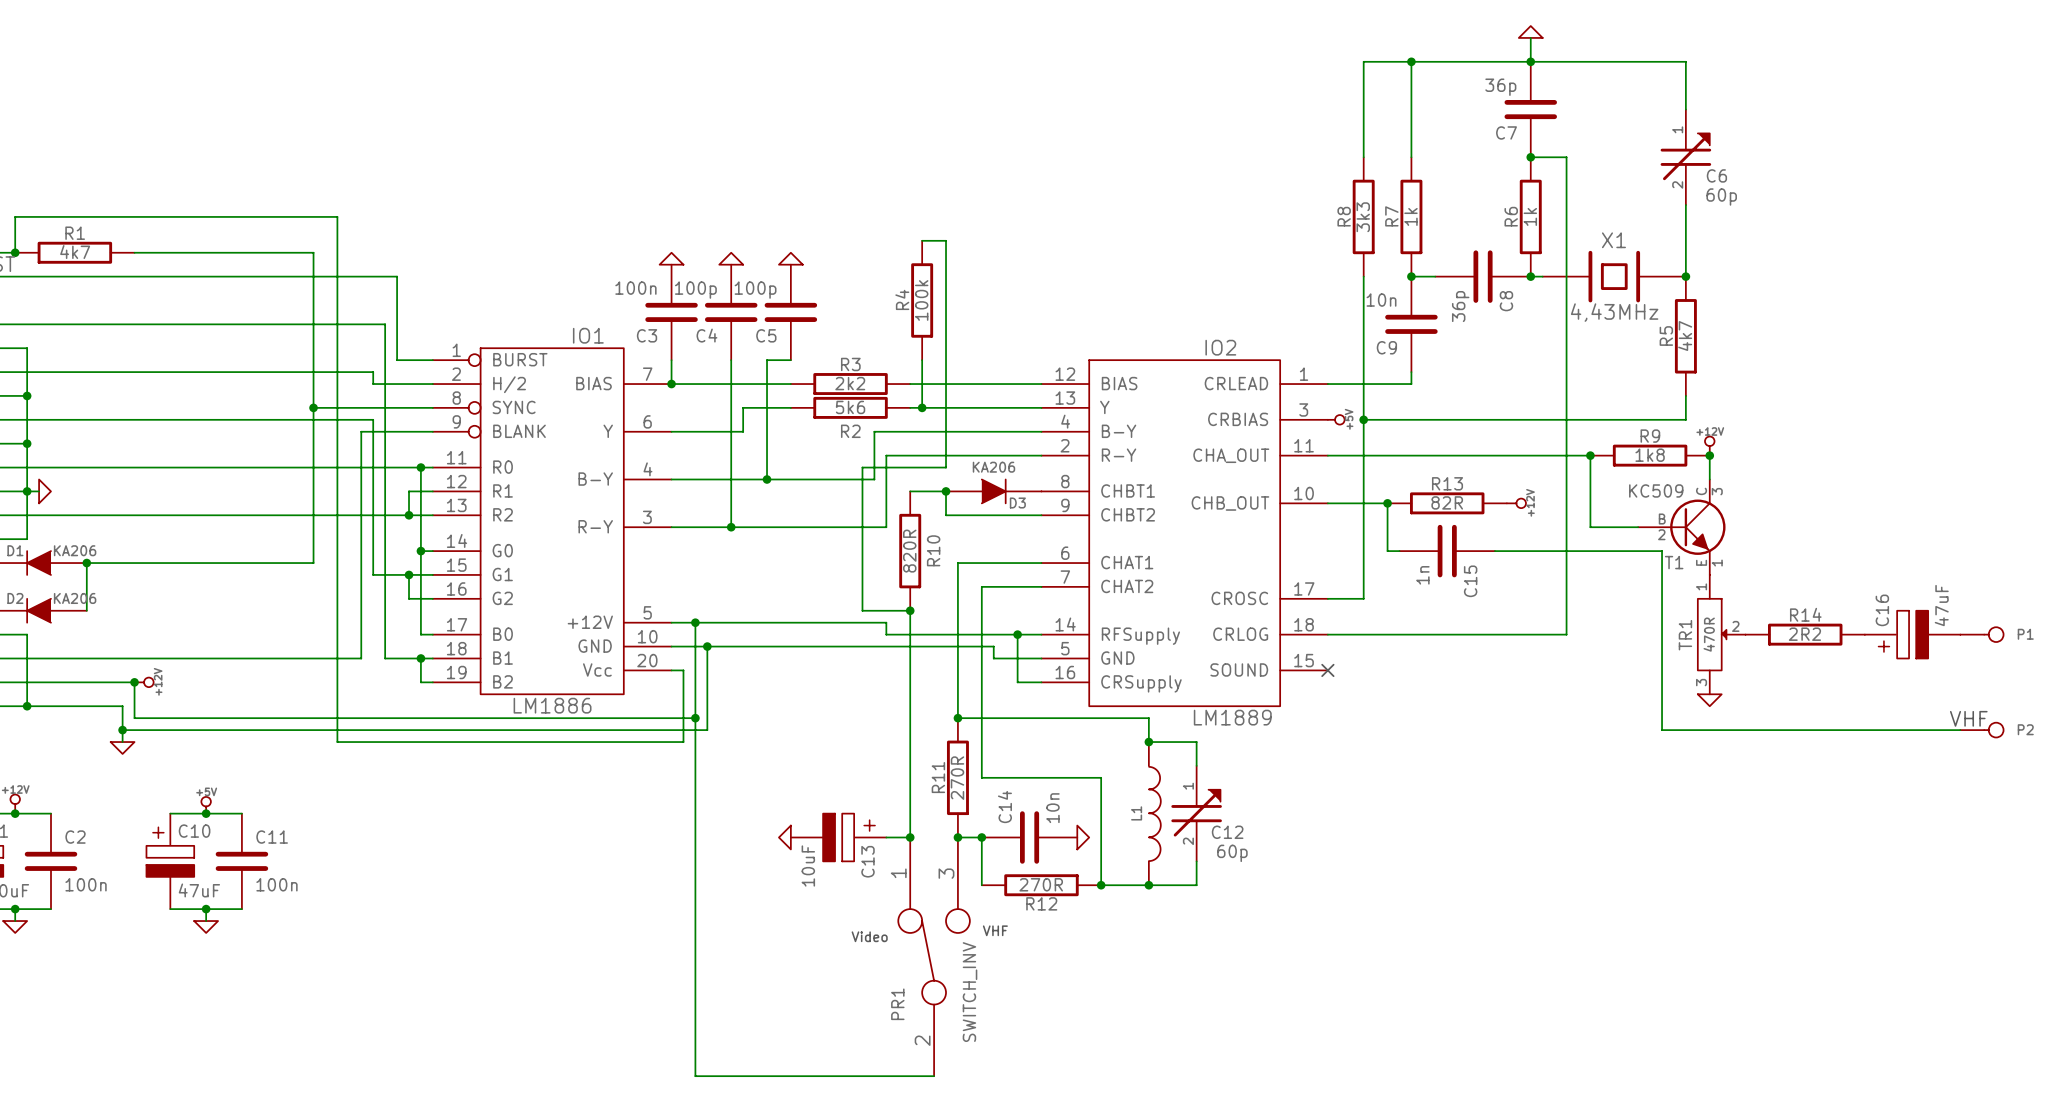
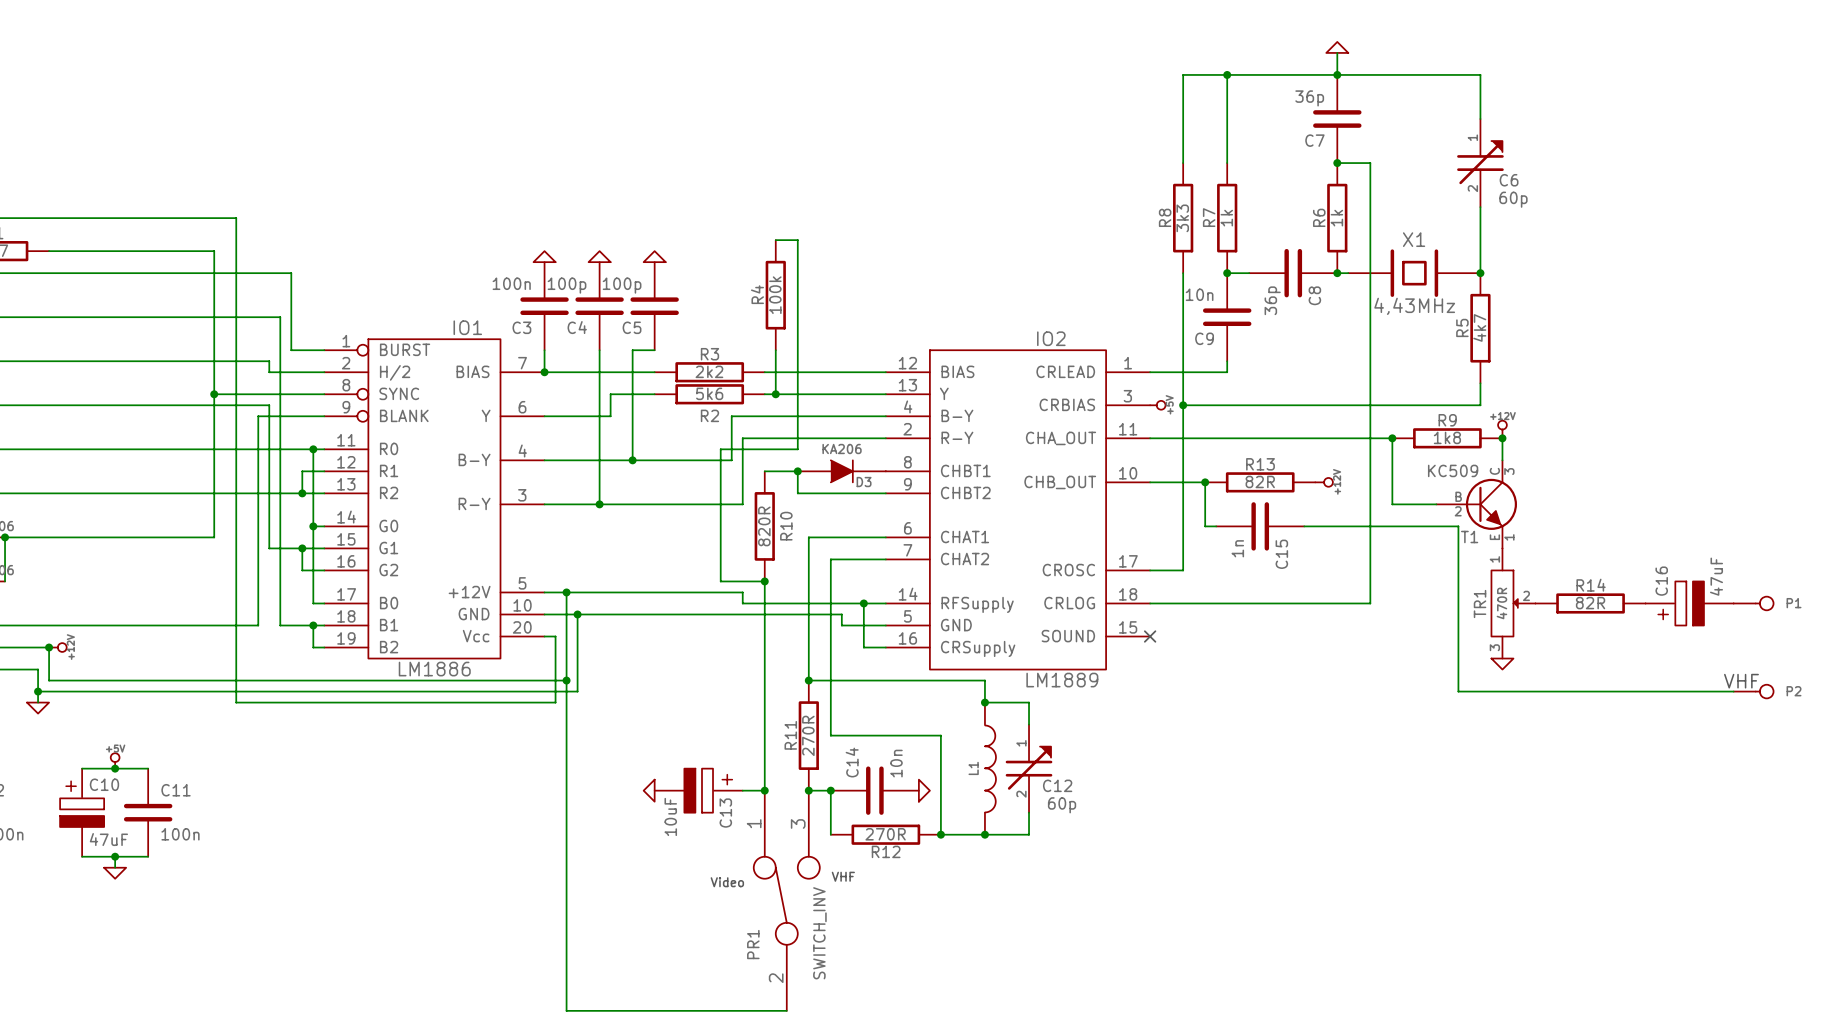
R14 value: 2R2 (1804, 634) -> 82R (1590, 603)

